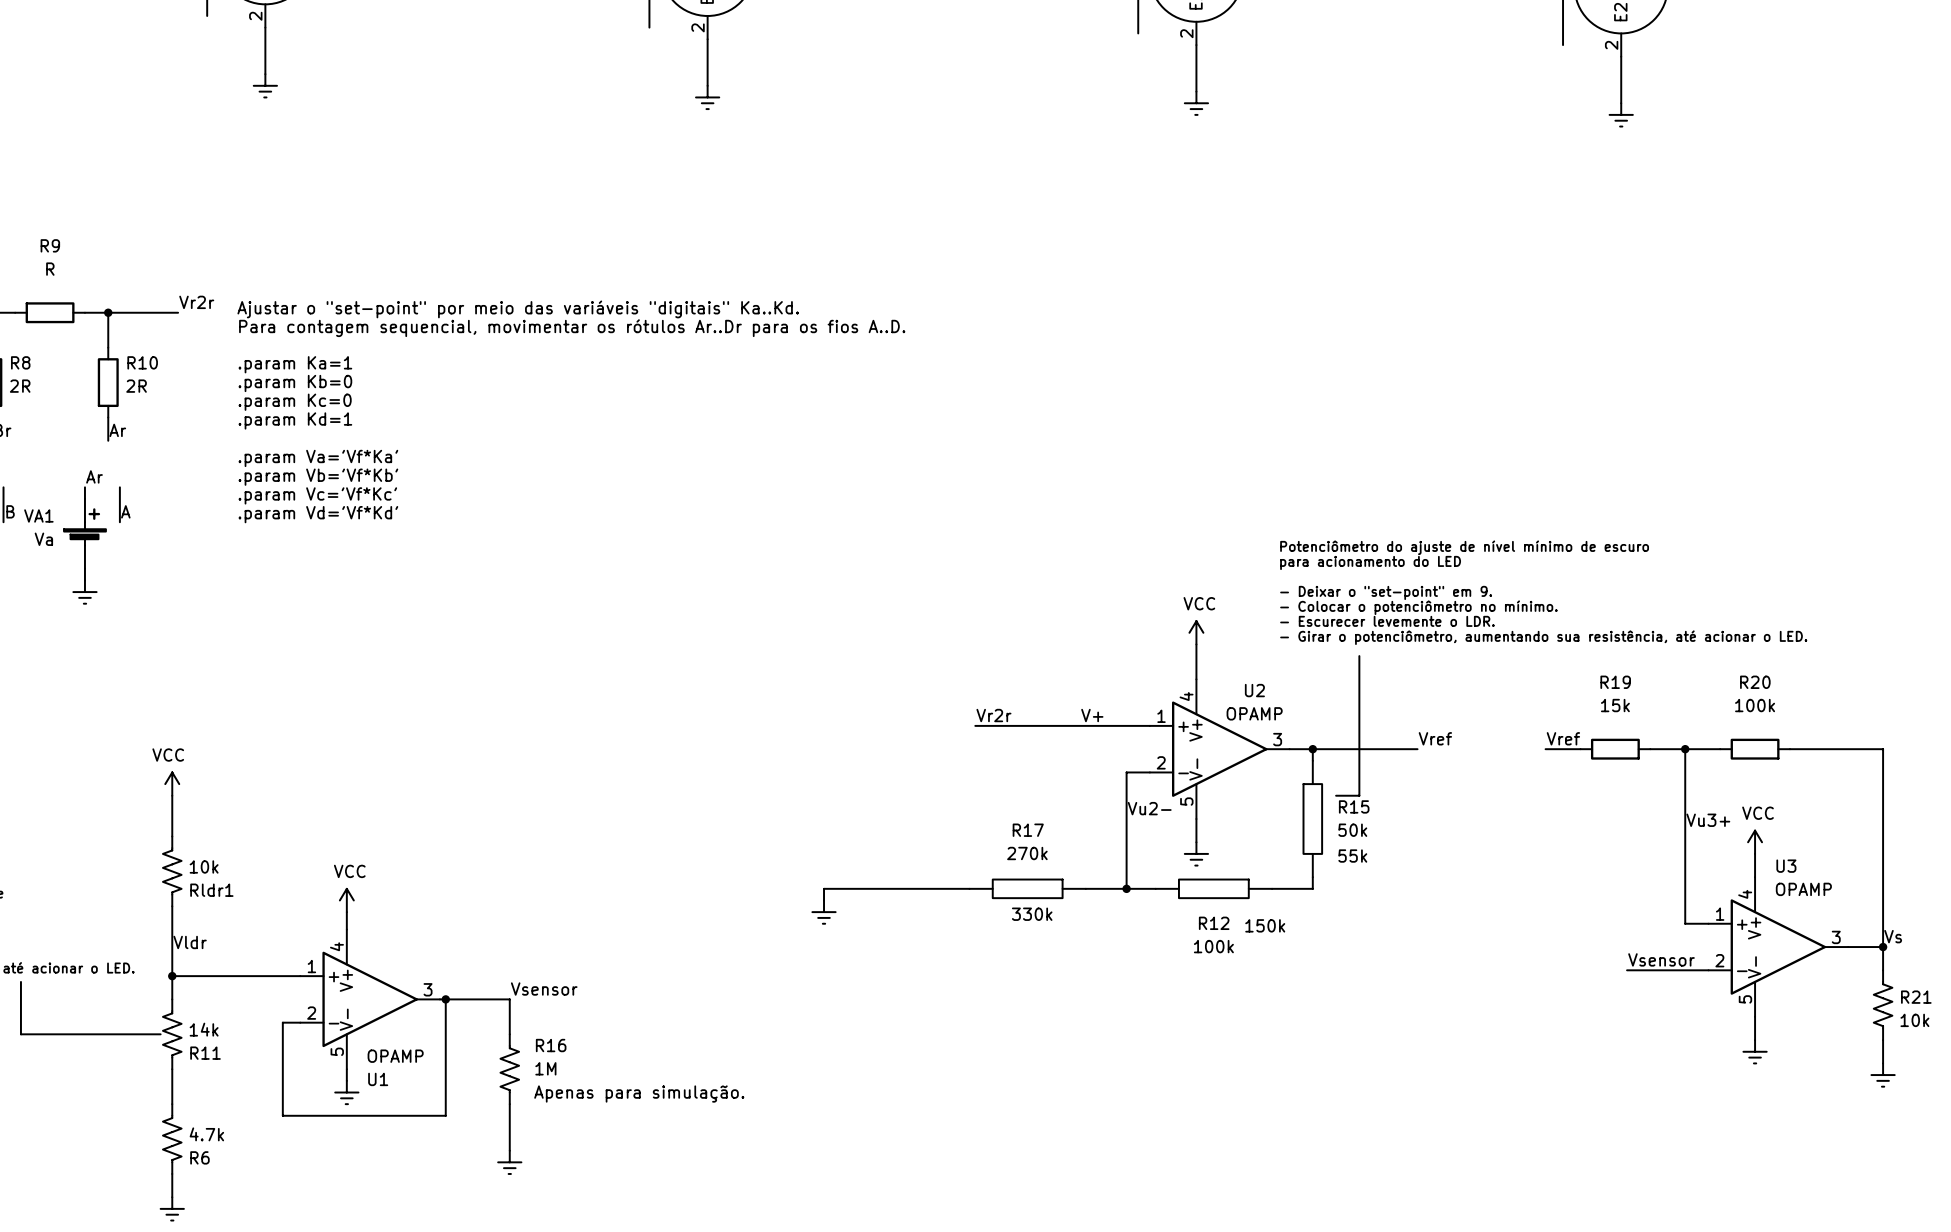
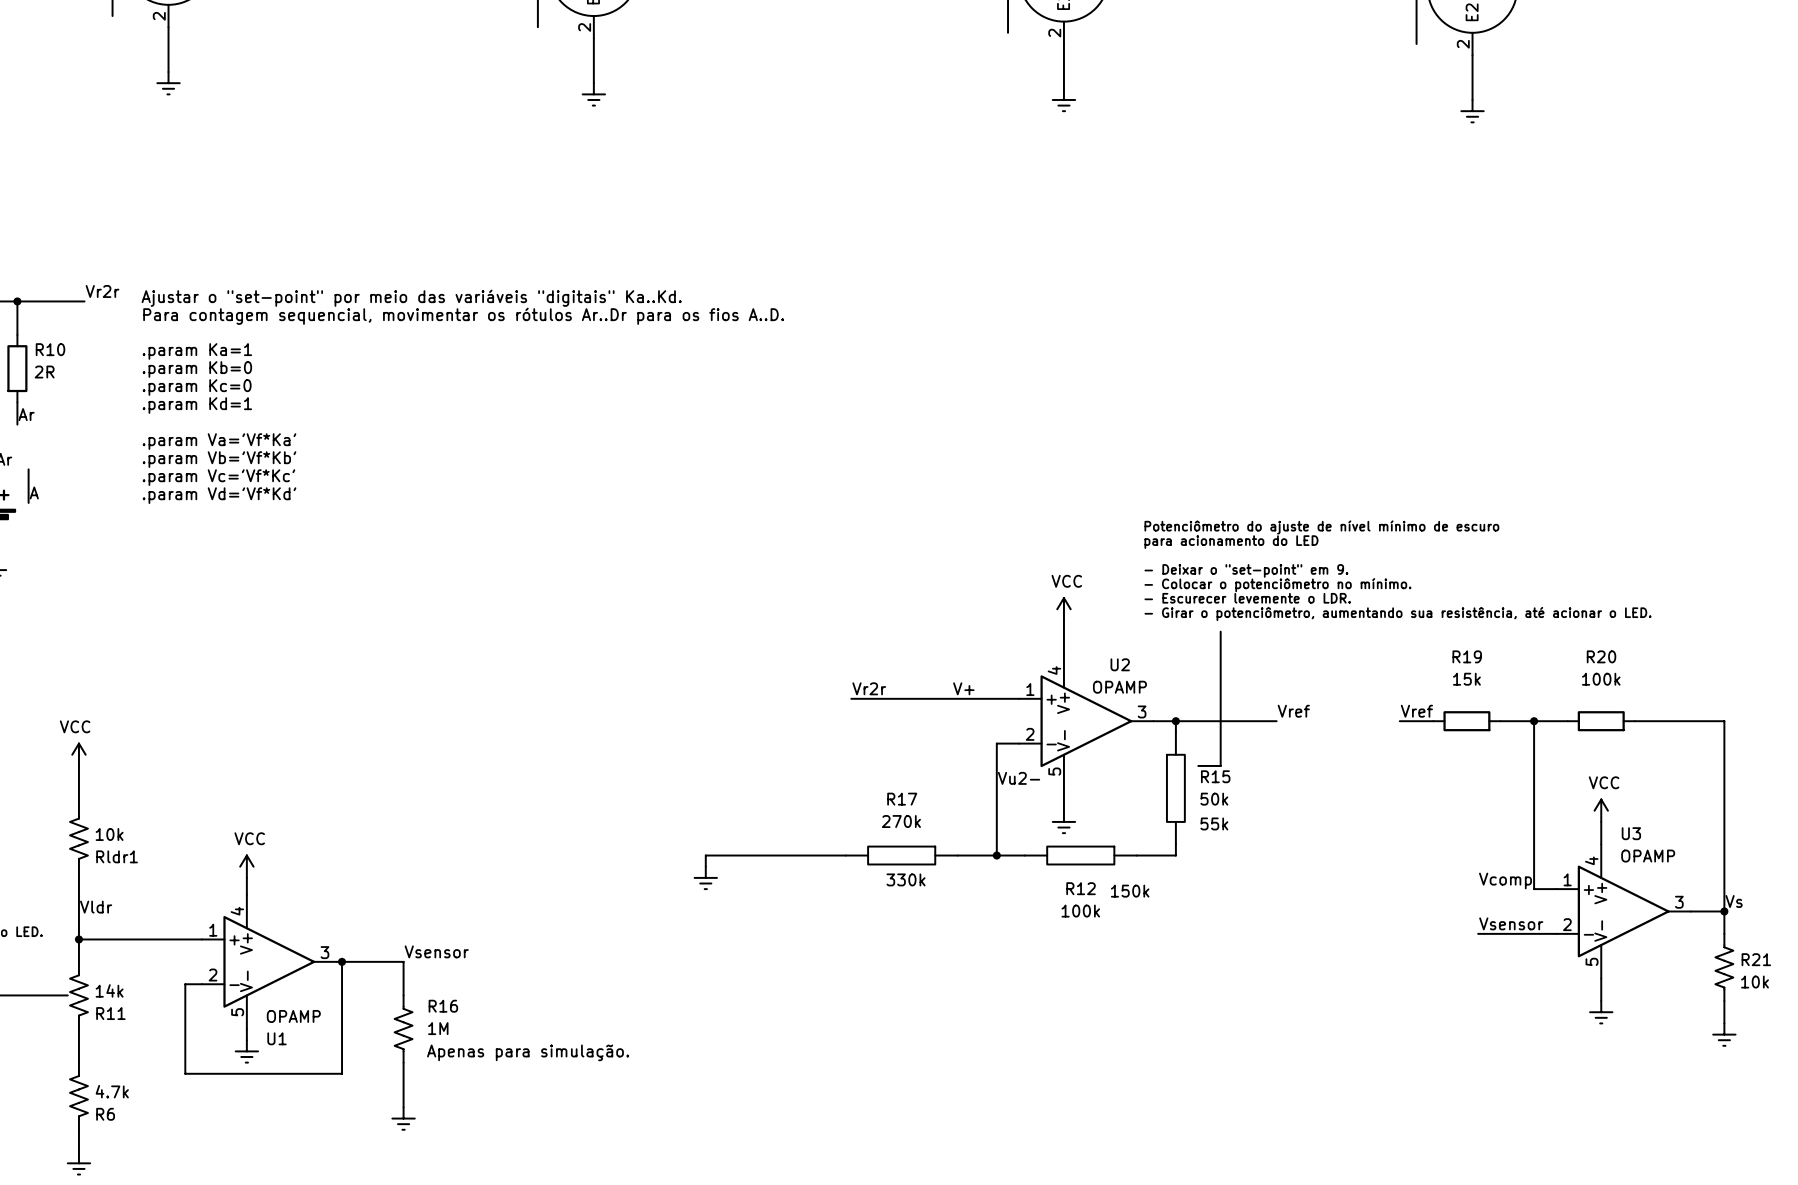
label: Vu3+ (1708, 820) -> none
label: none -> Vcomp (1505, 880)

